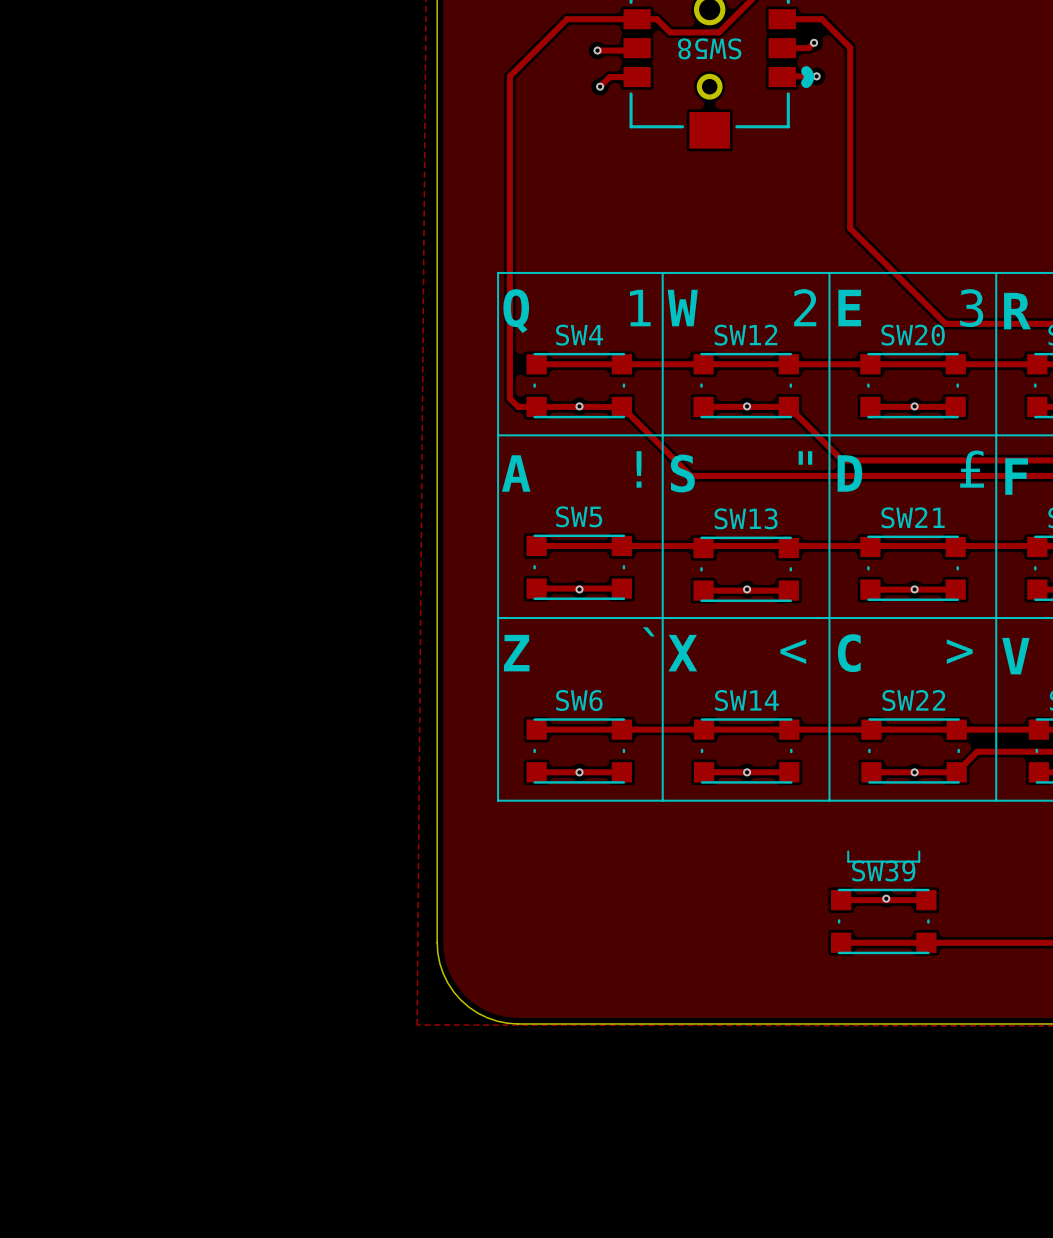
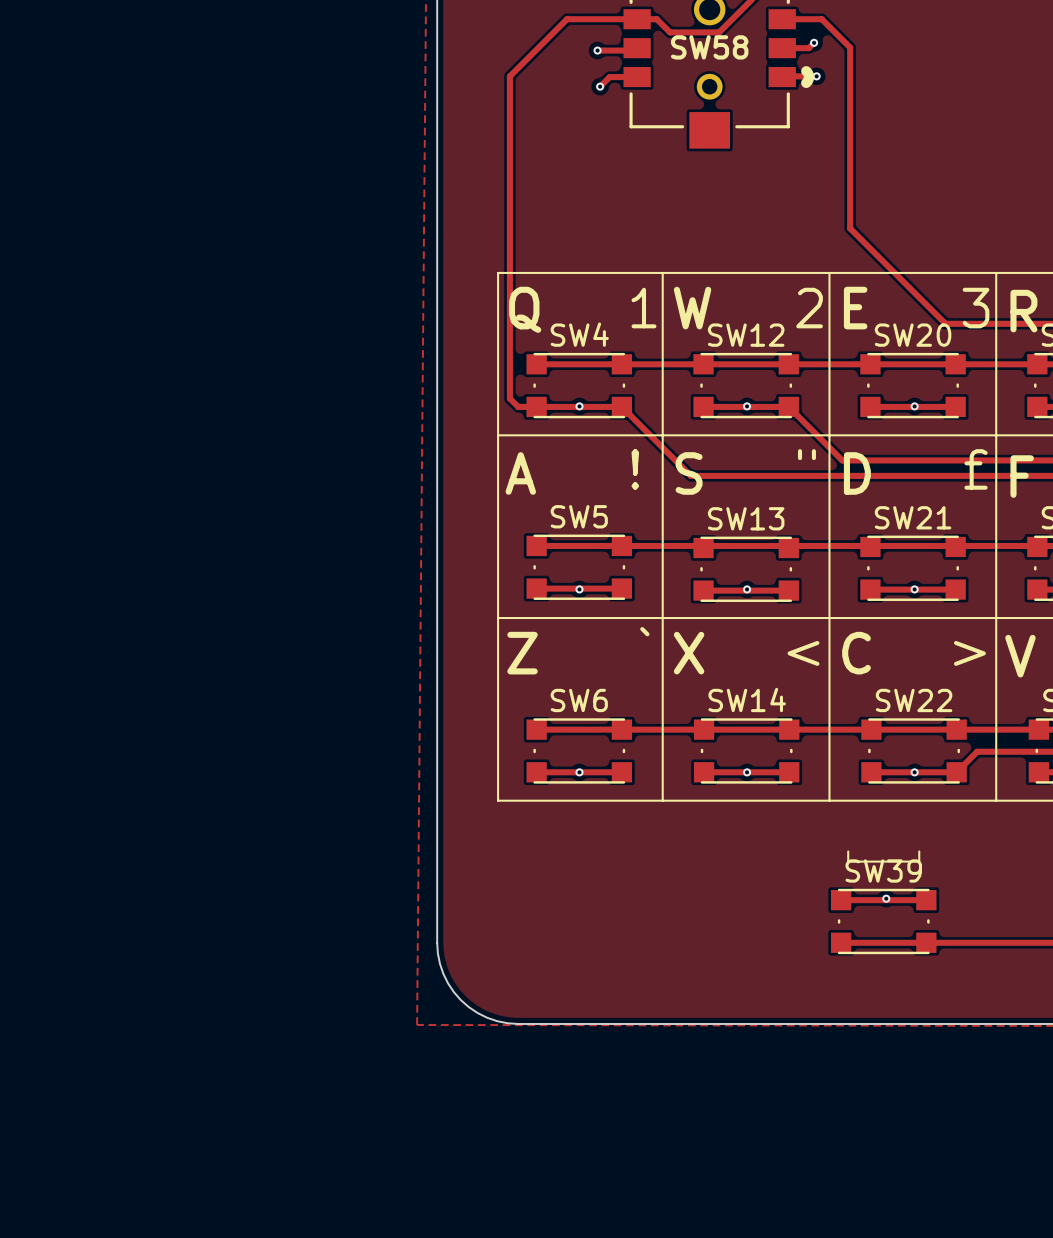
SW58 name rotation: 0° (709, 48) -> 180° (709, 47)

